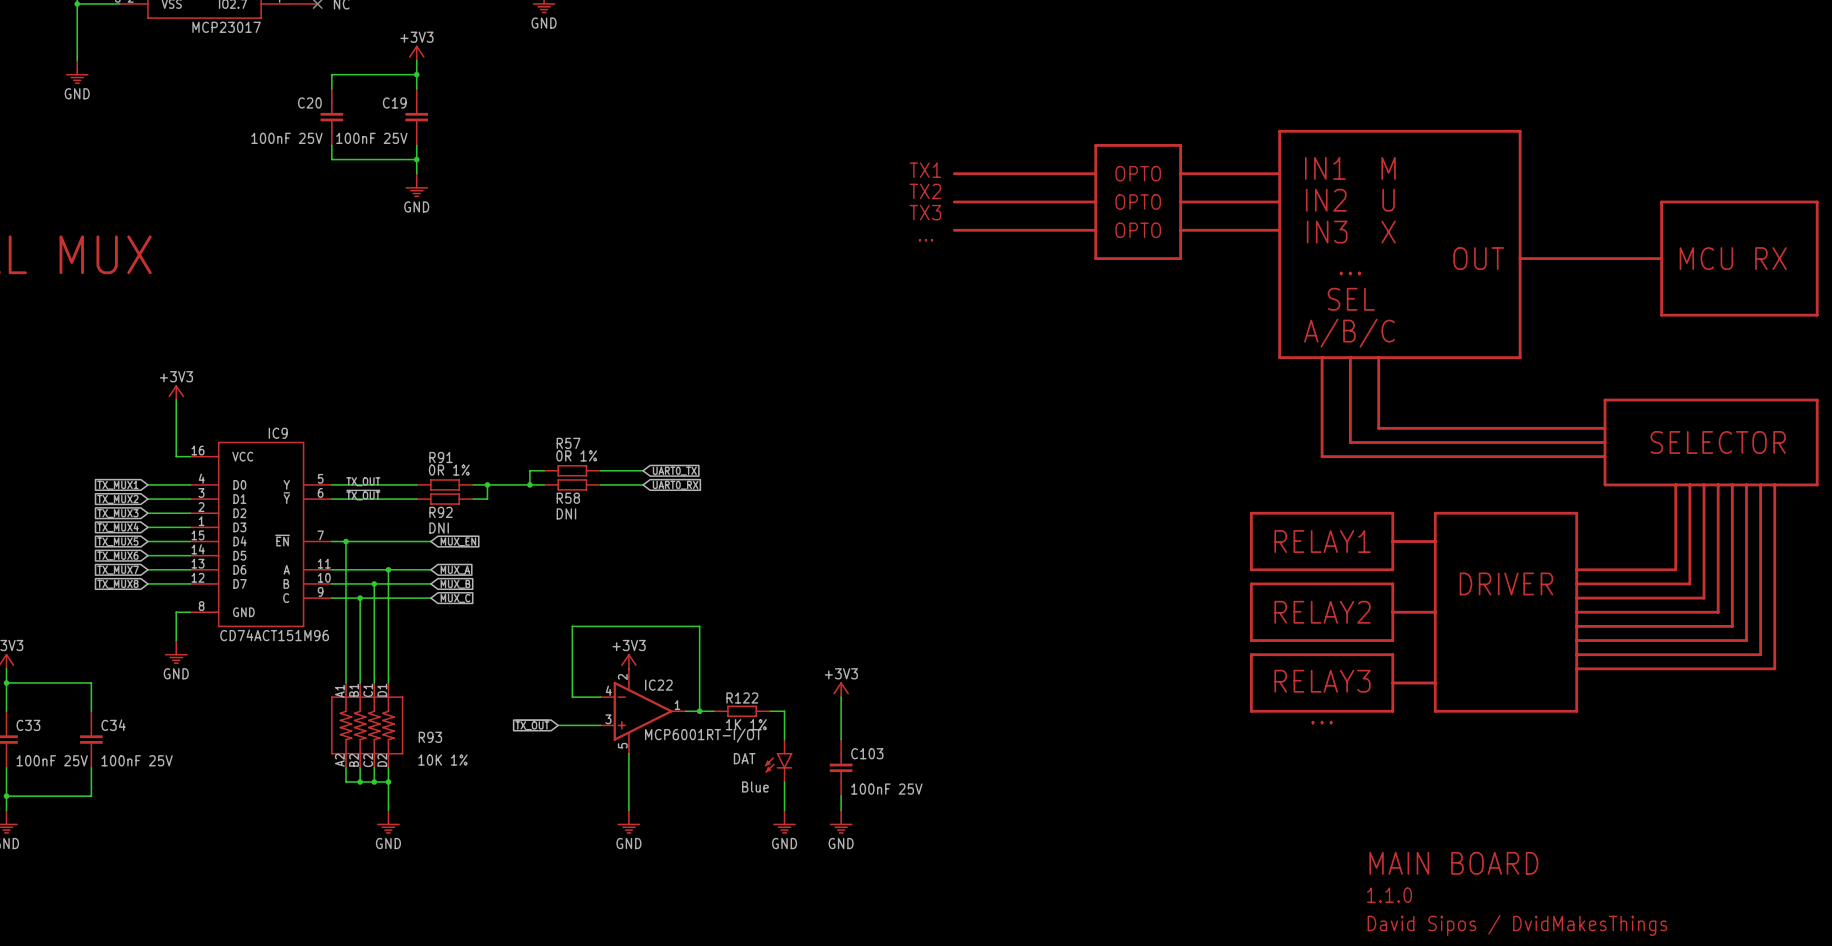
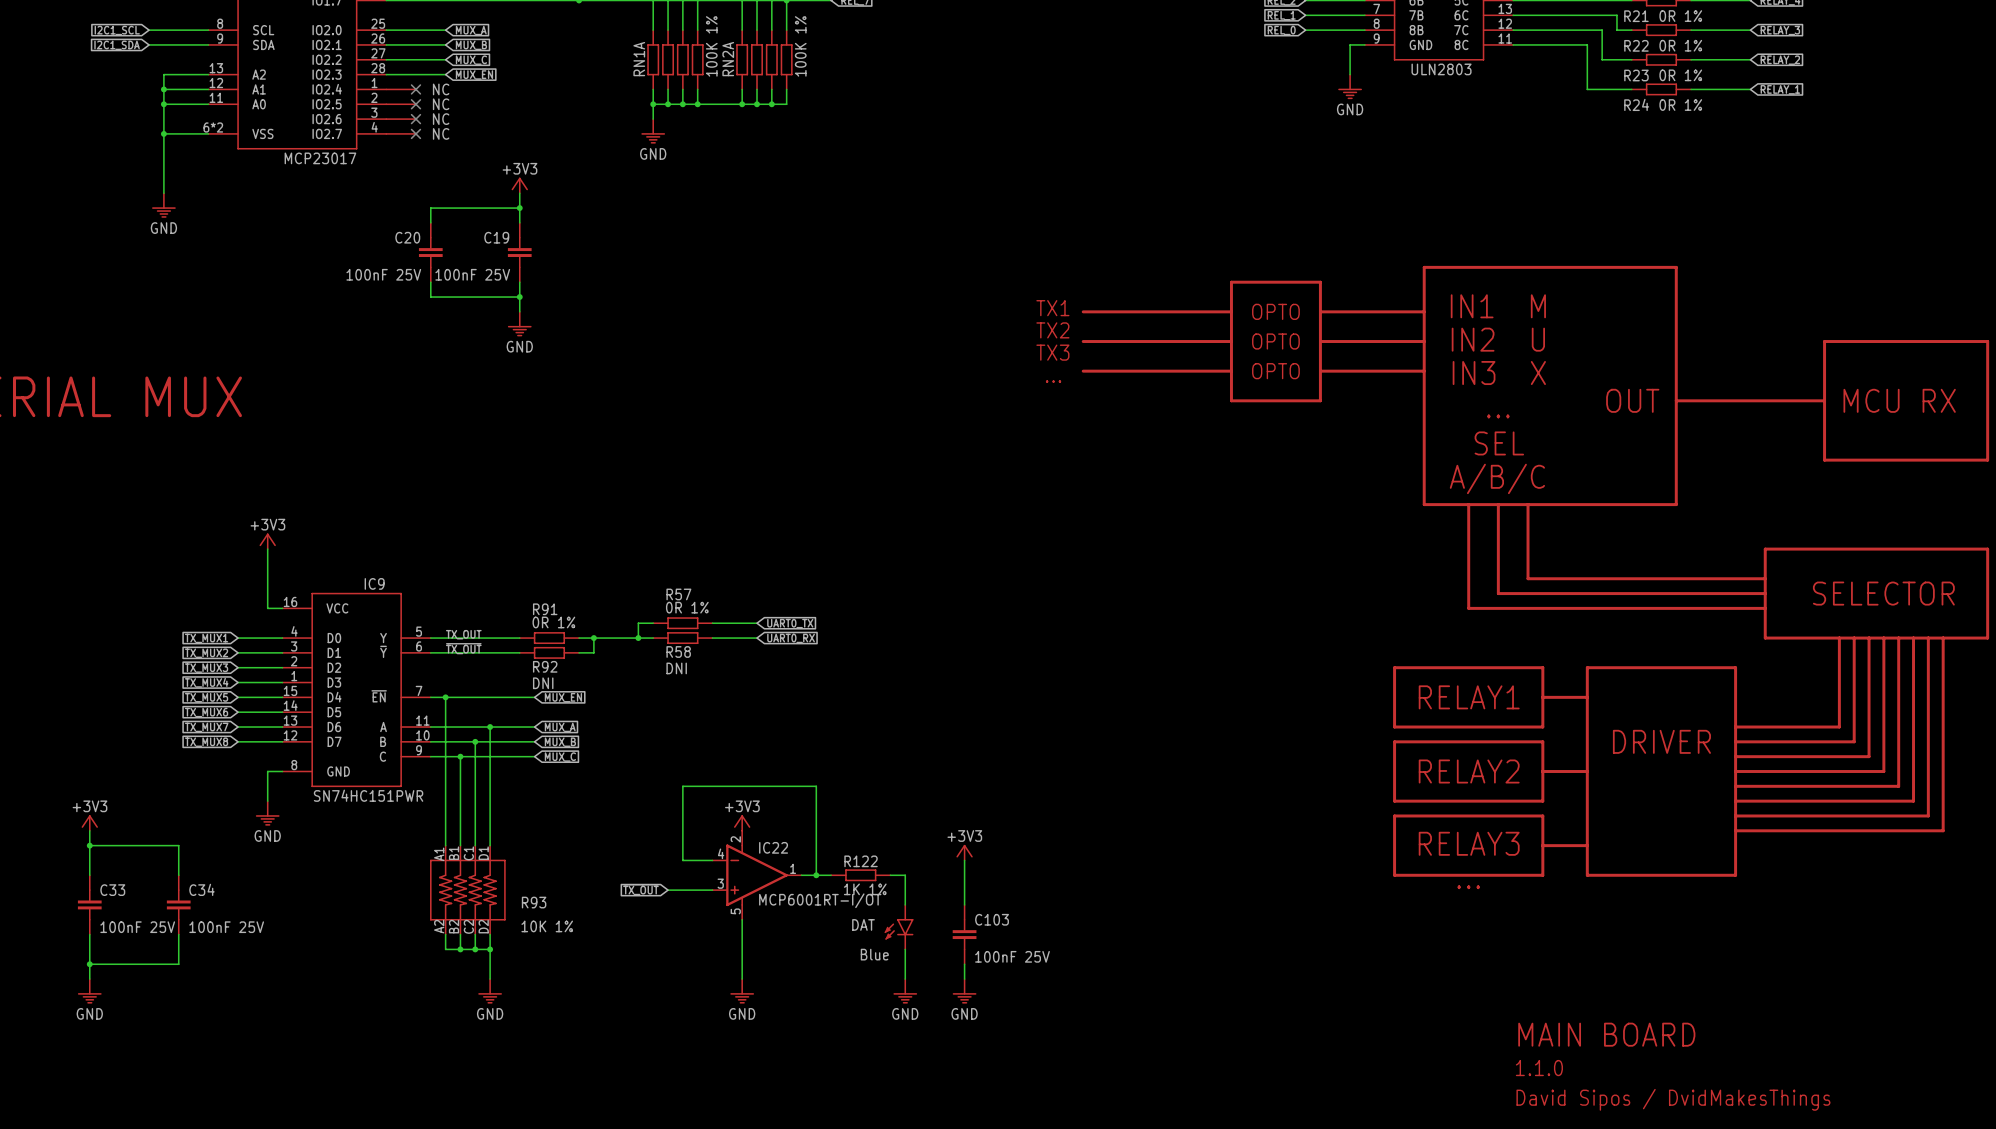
IC9 value: CD74ACT151M96 (274, 635) -> SN74HC151PWR (368, 795)

